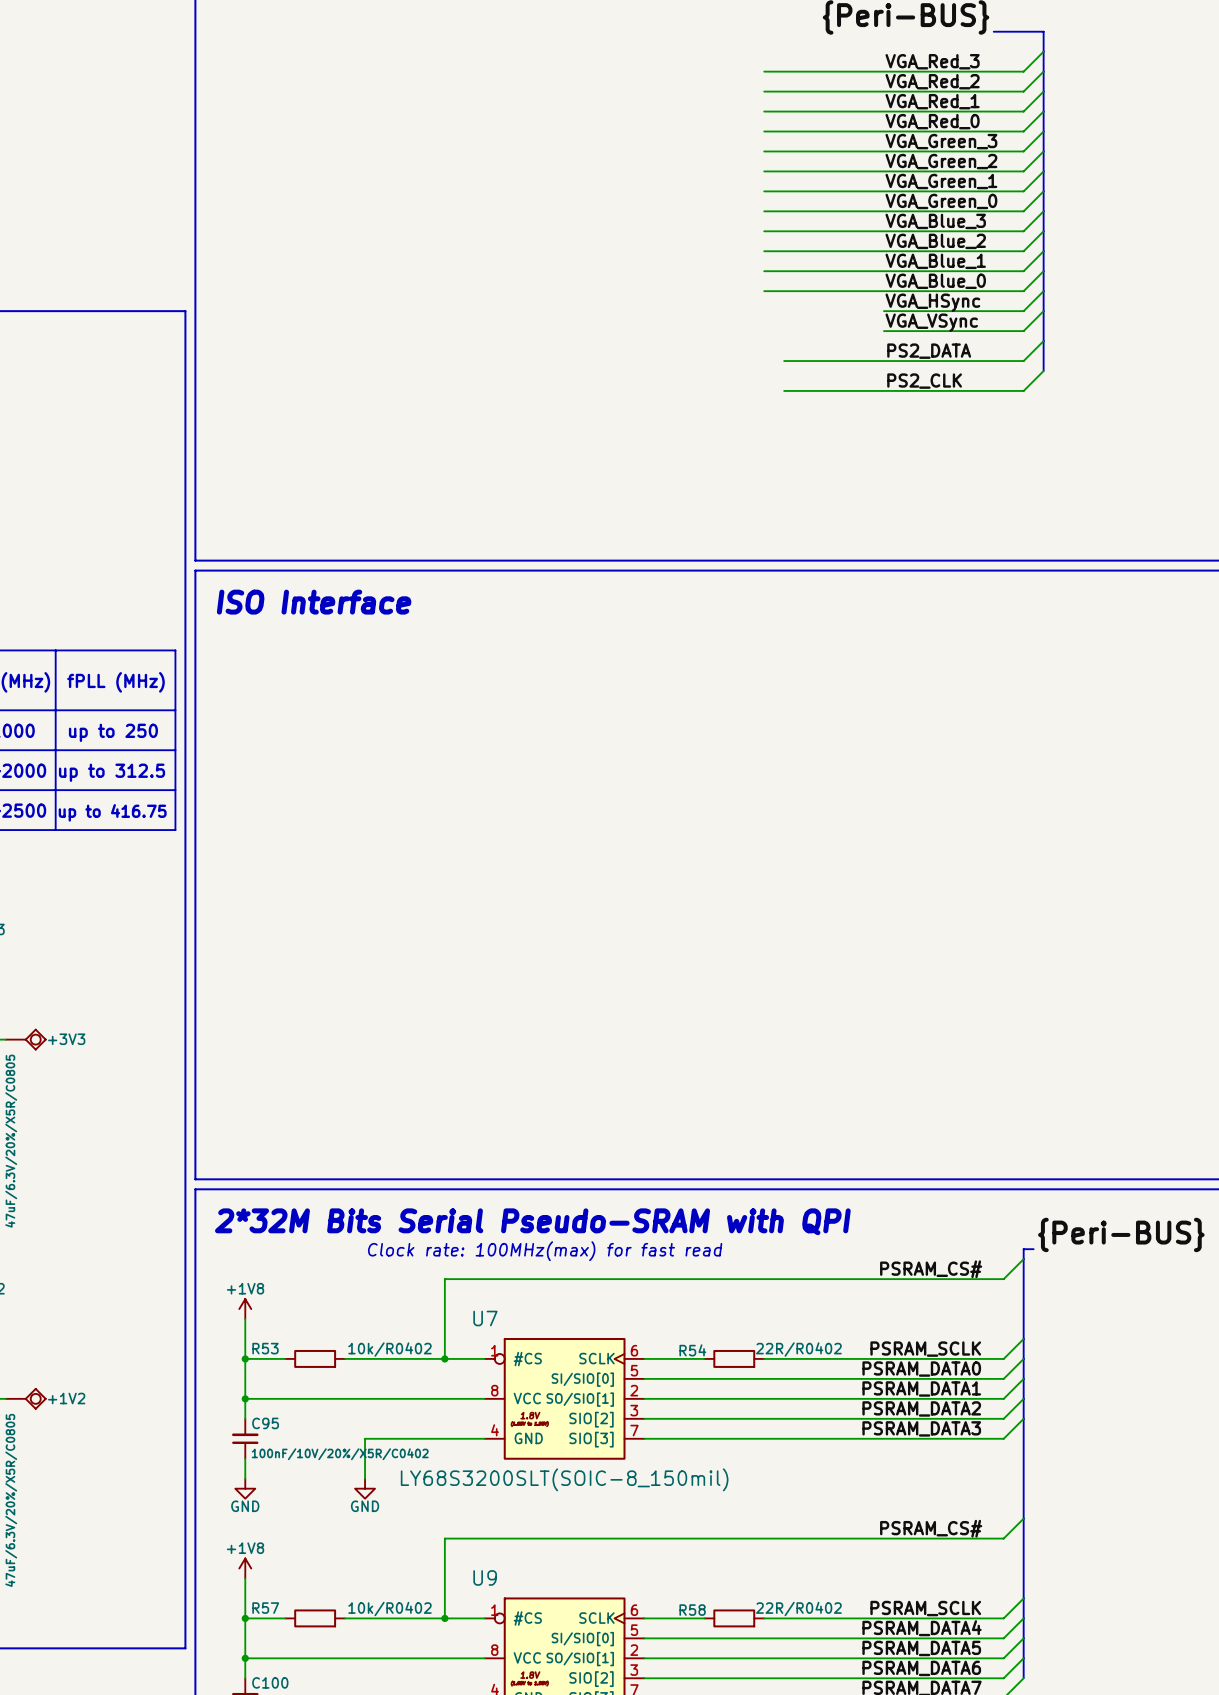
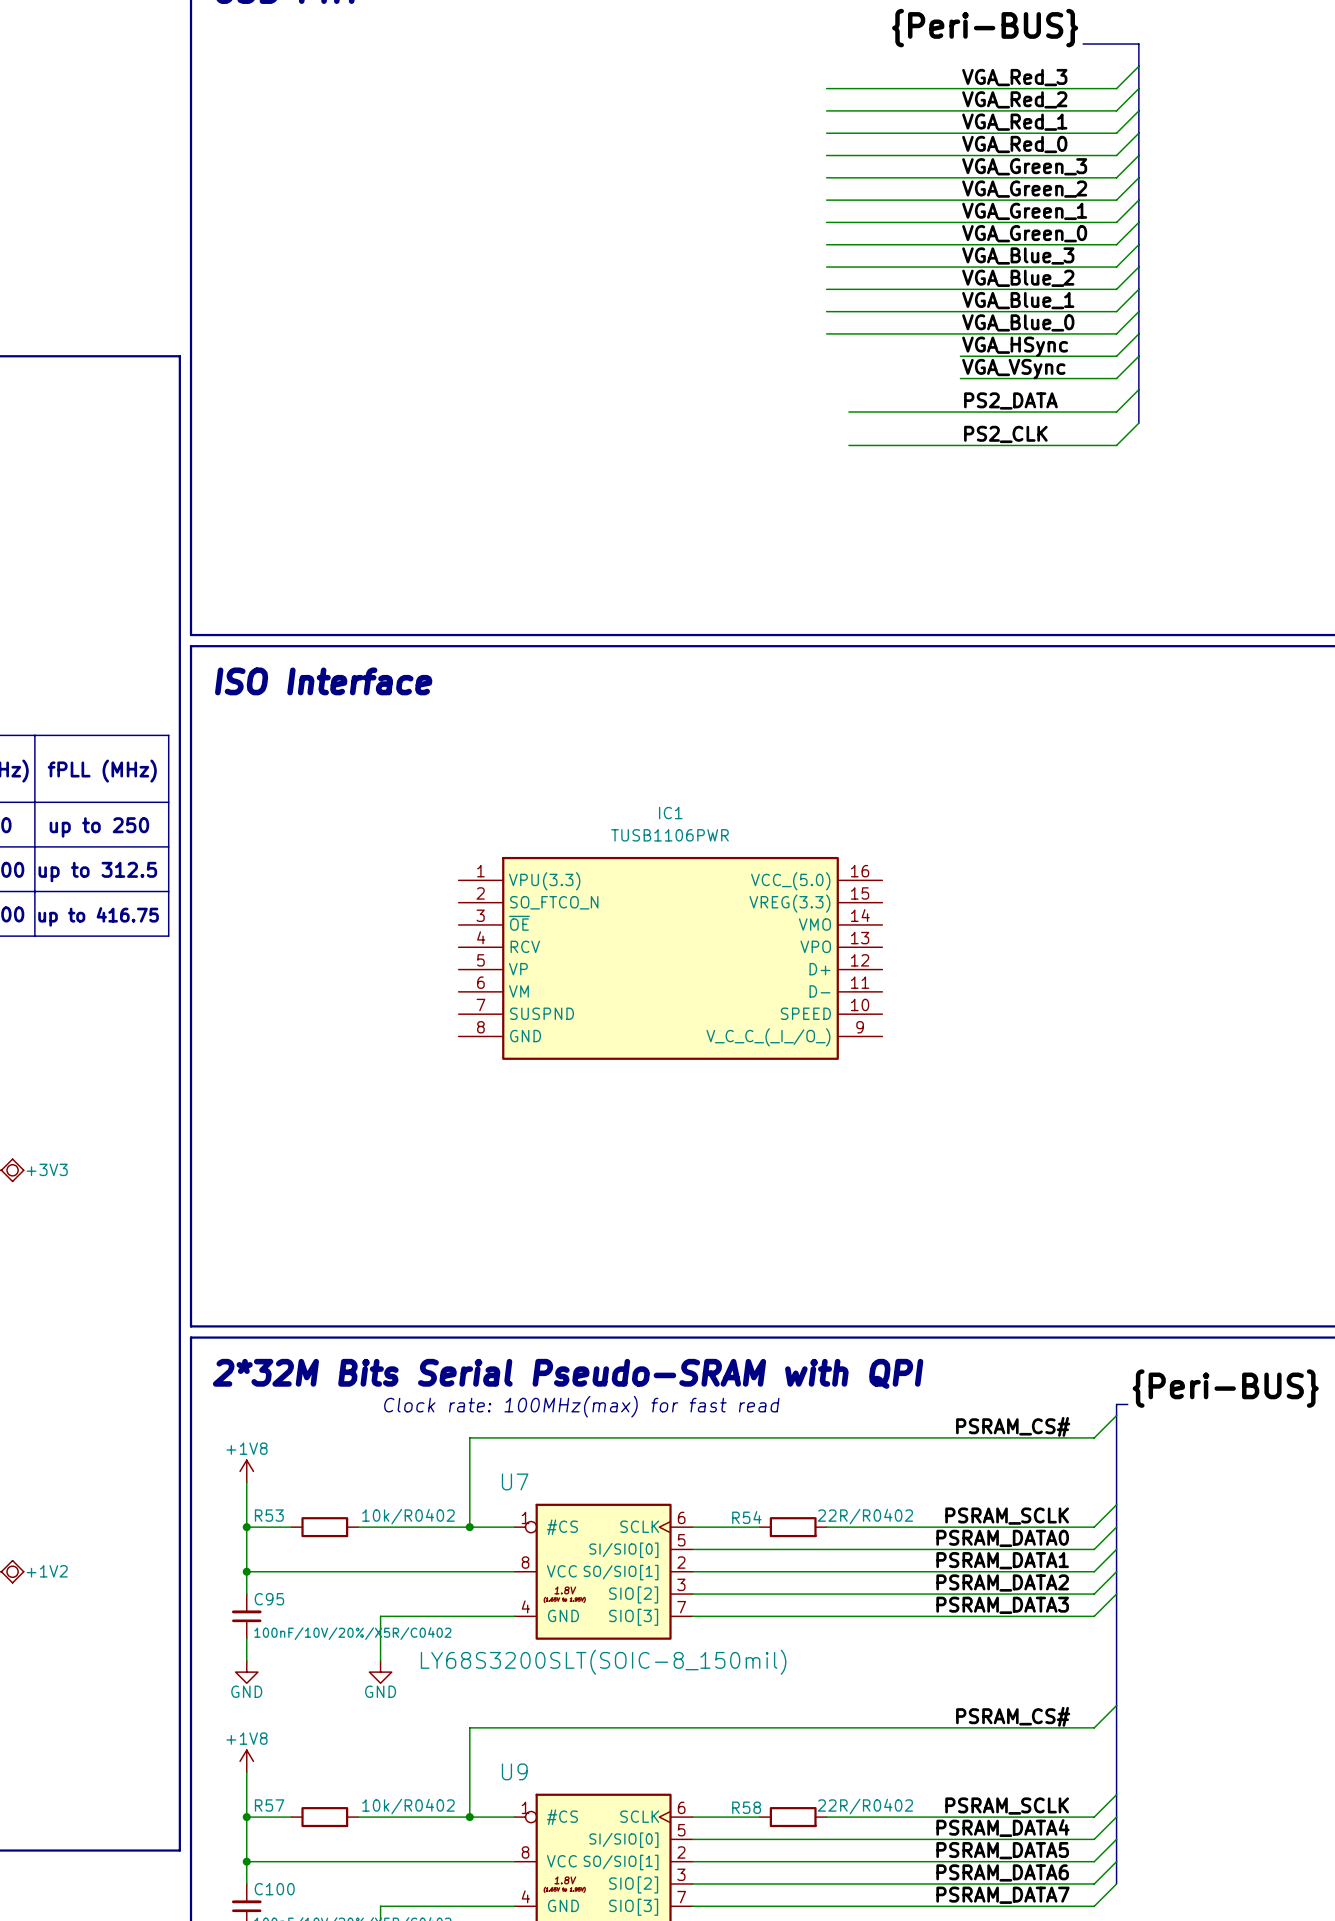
IC1: none -> TUSB1106PWR (670, 958)

